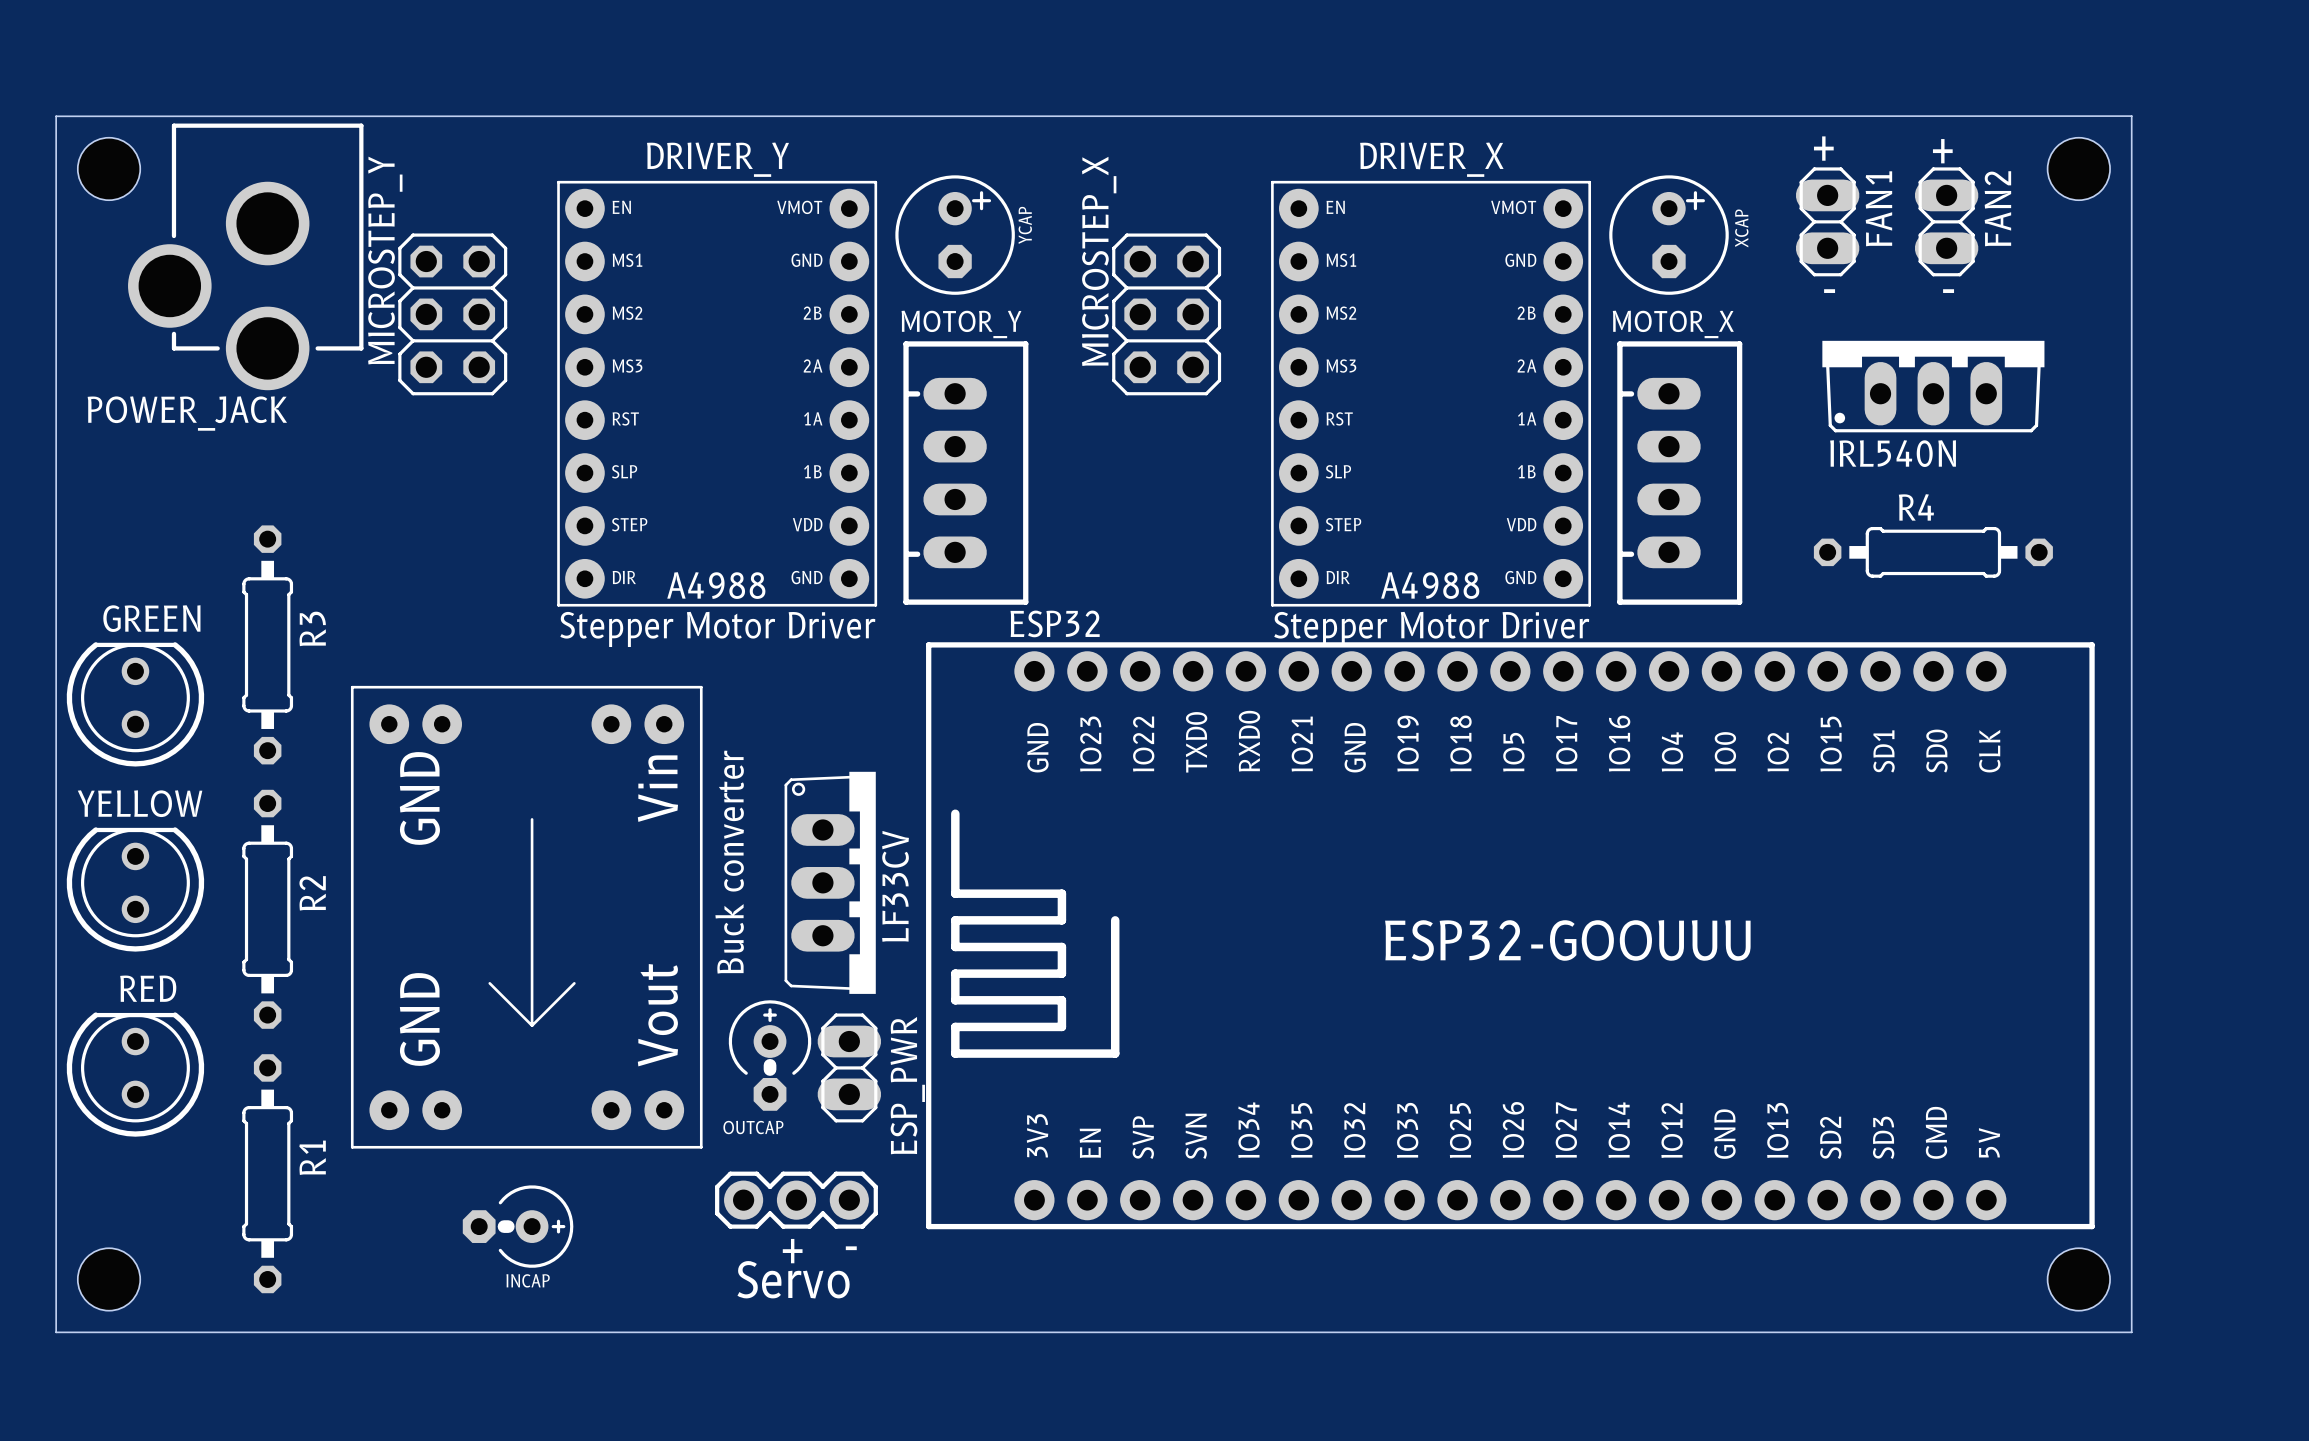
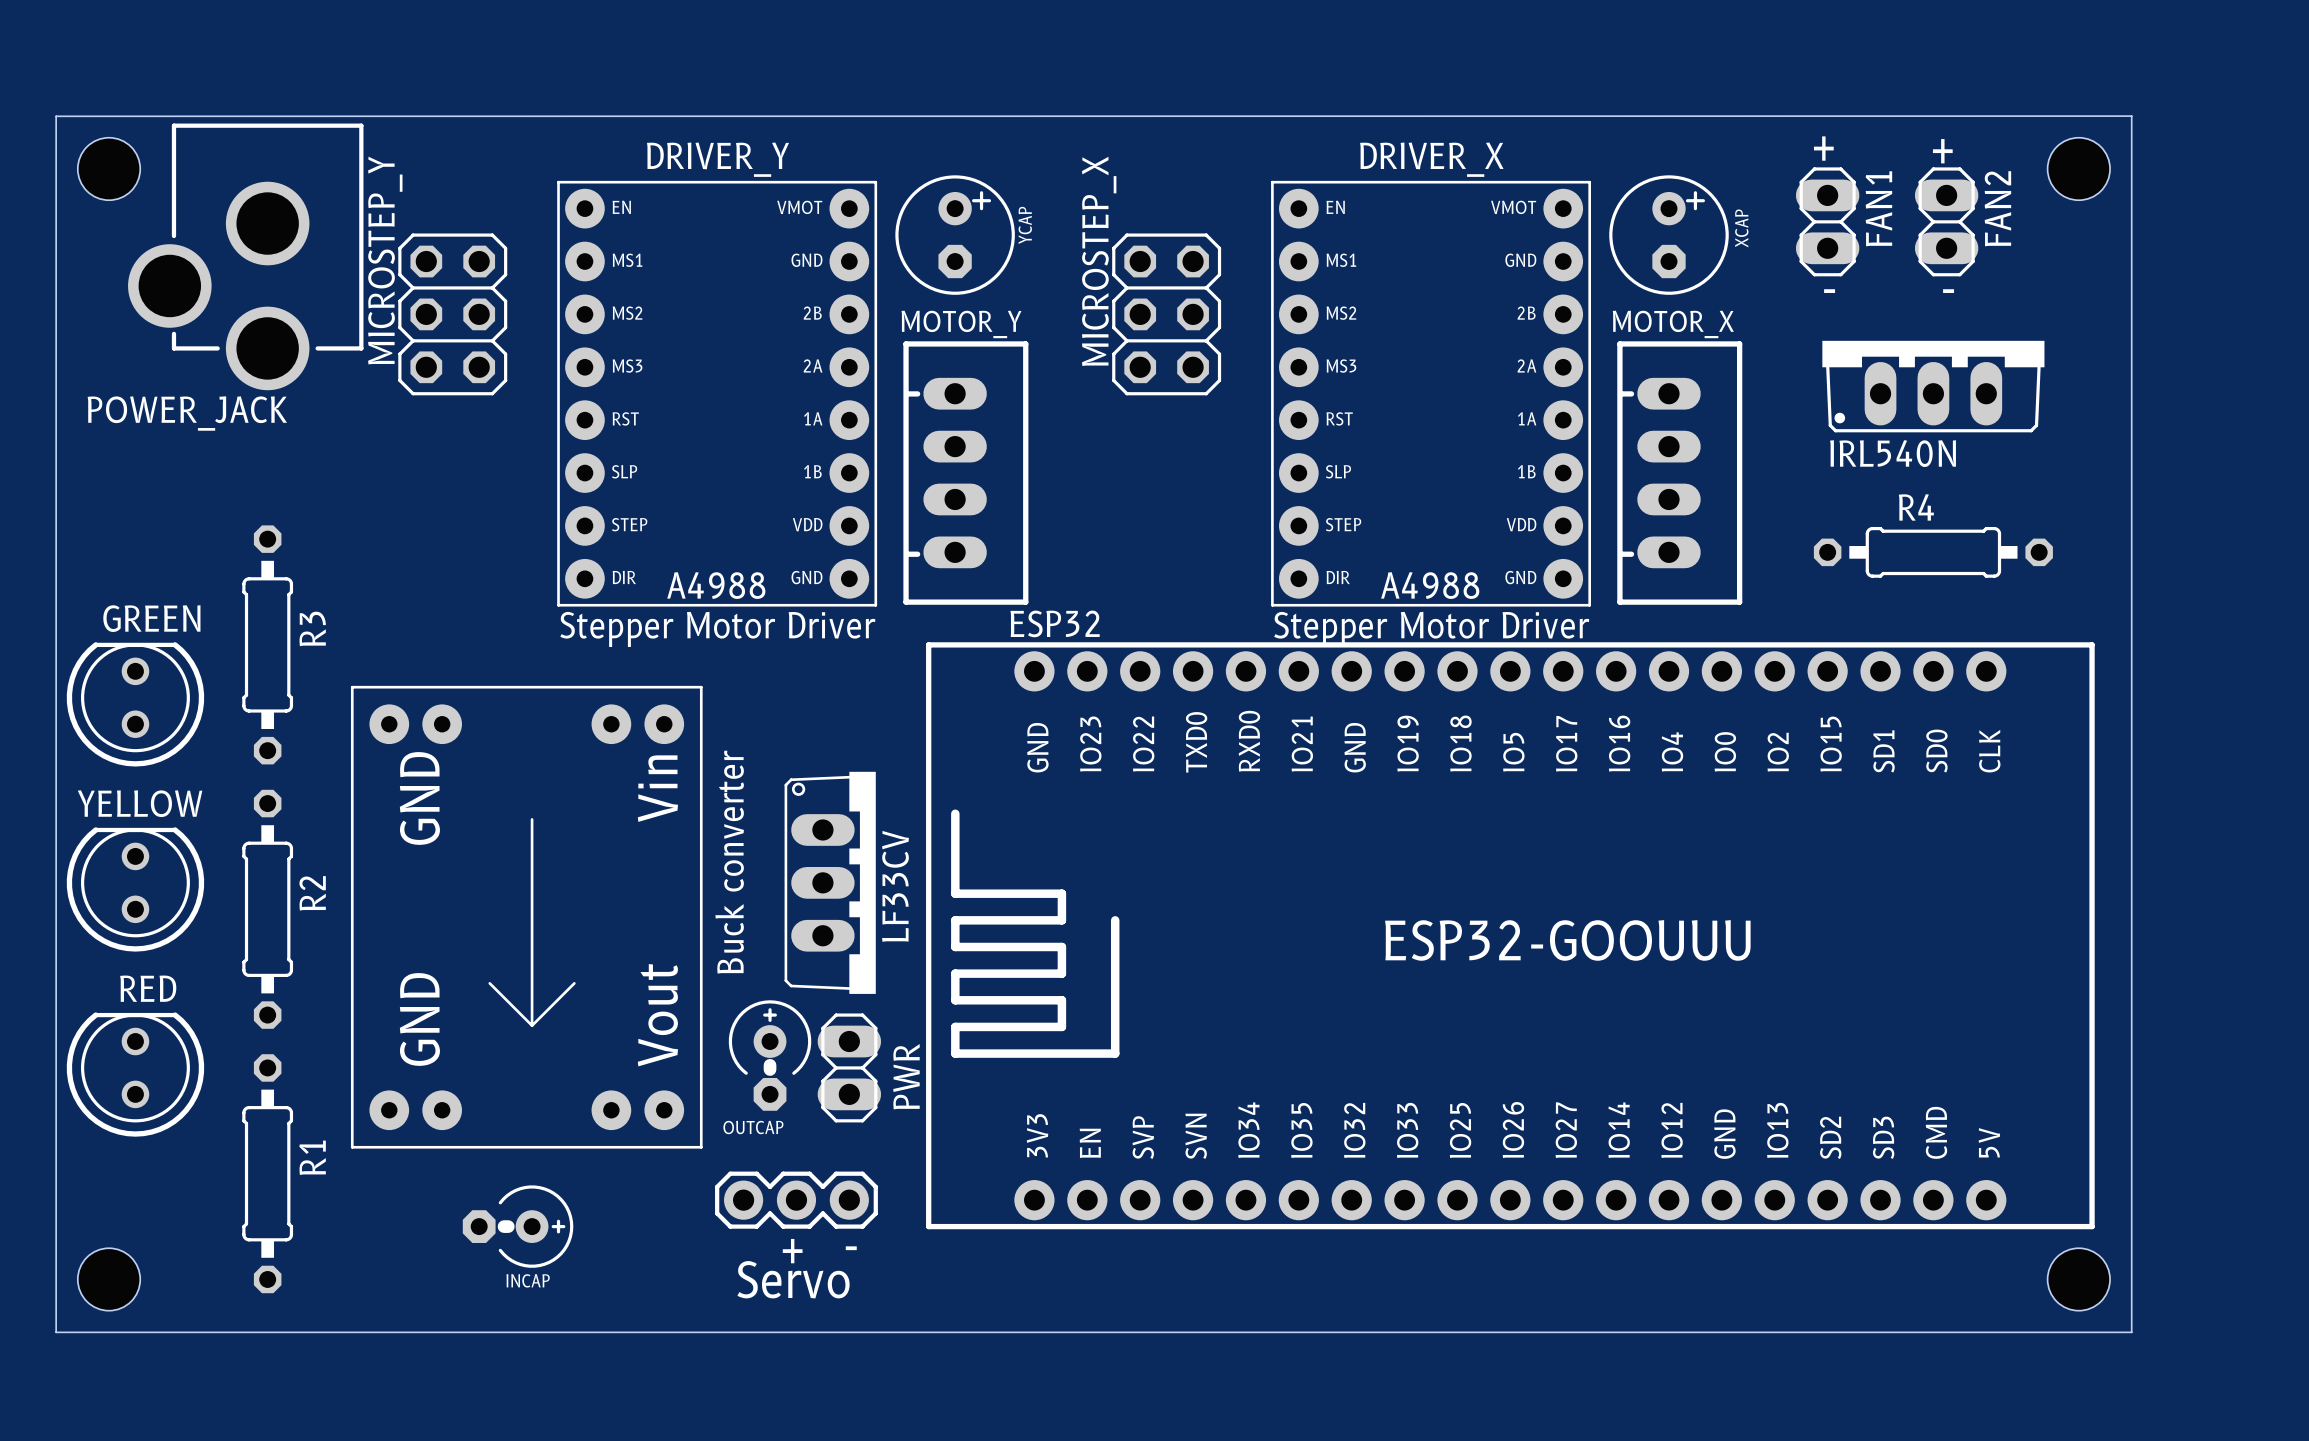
ESP_PWR name: ESP_PWR (907, 1085) -> PWR (906, 1076)

